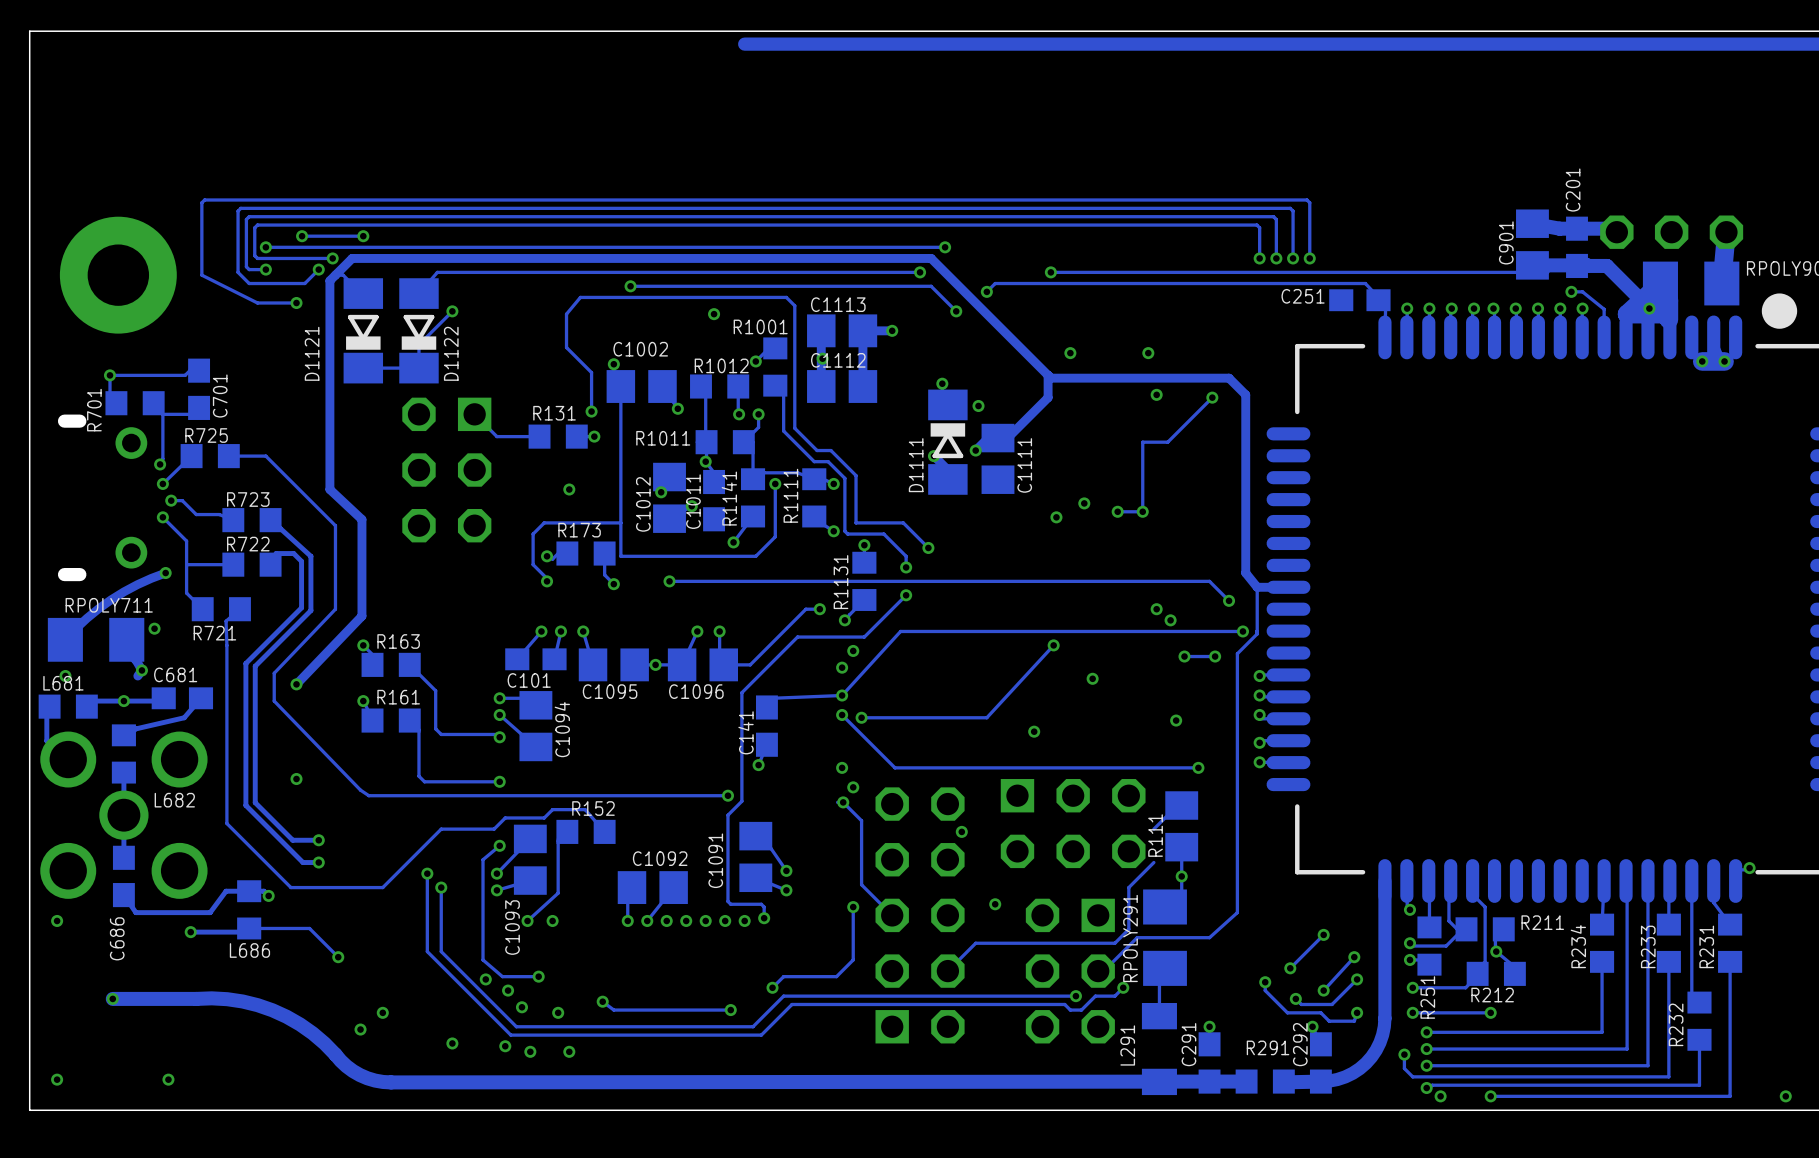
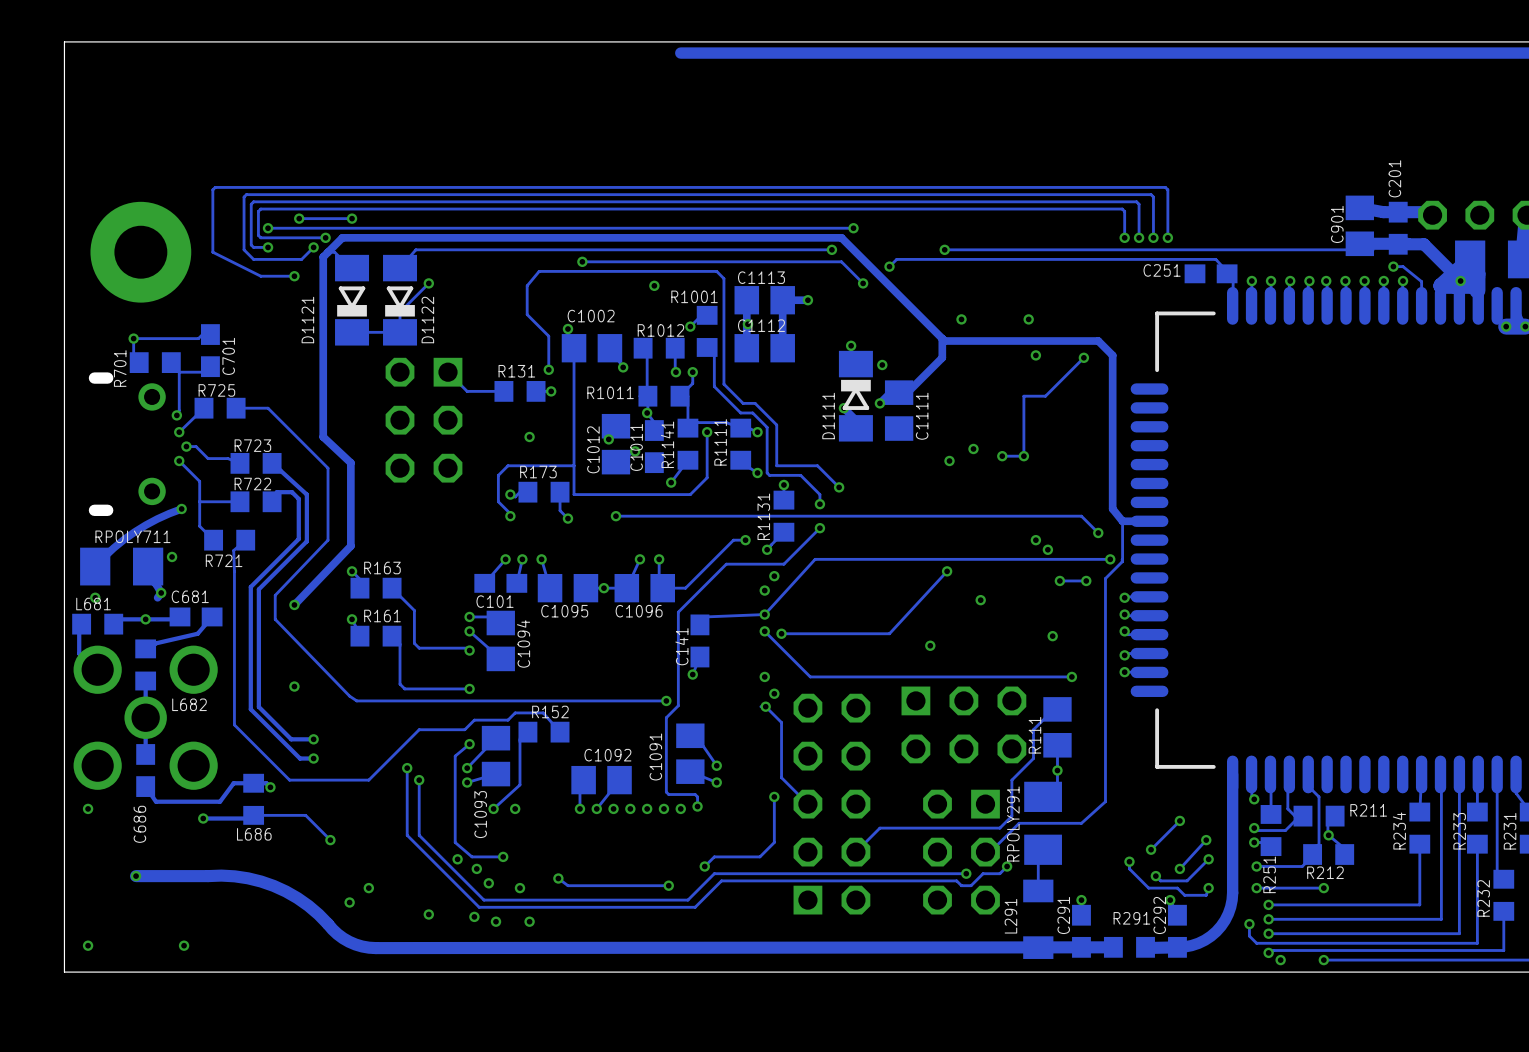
track: none -> (1033, 729) (1033, 758)
via: (961, 831) -> none
via: (995, 904) -> none

